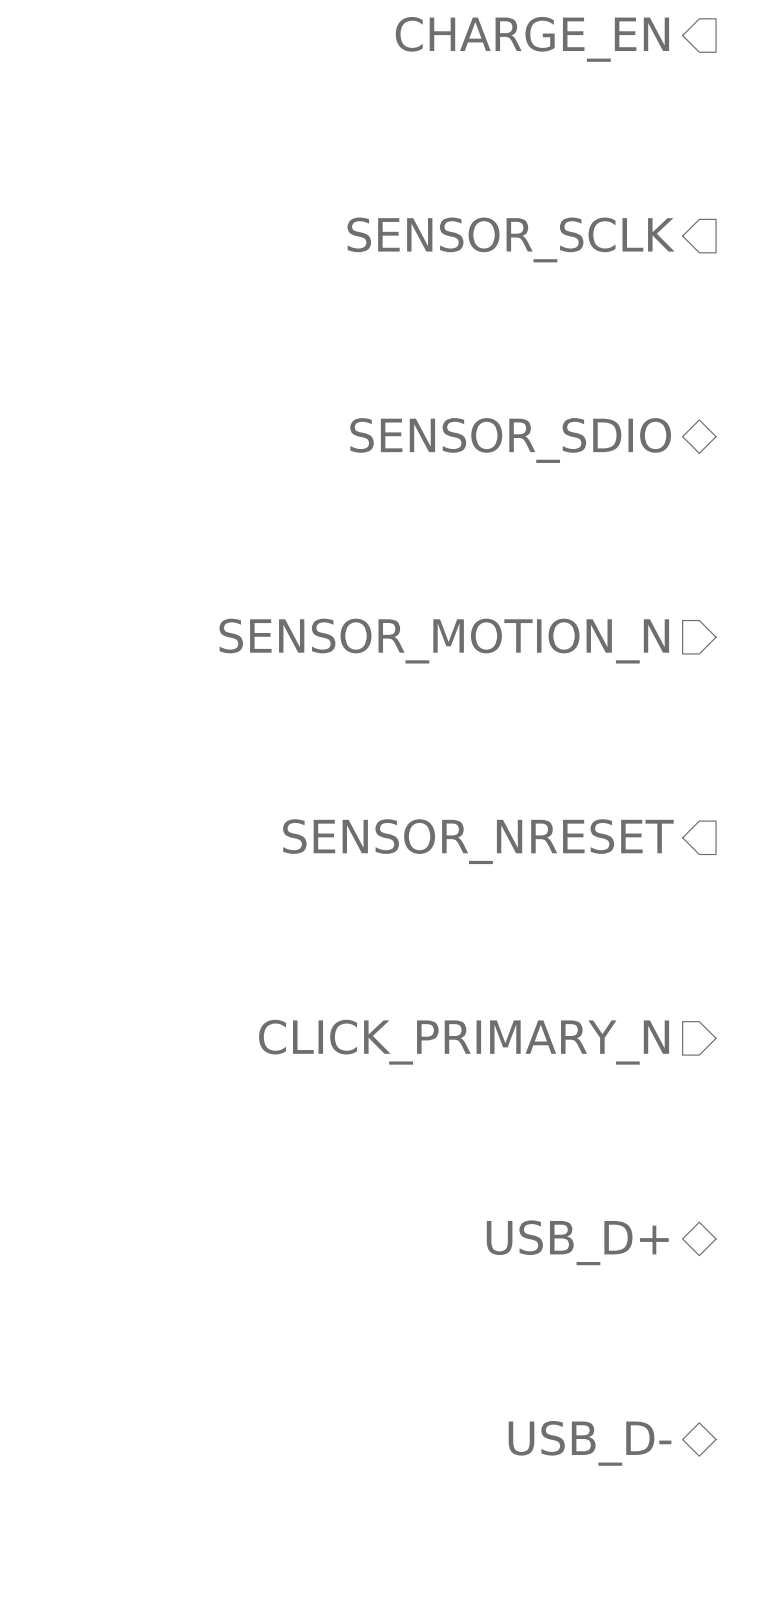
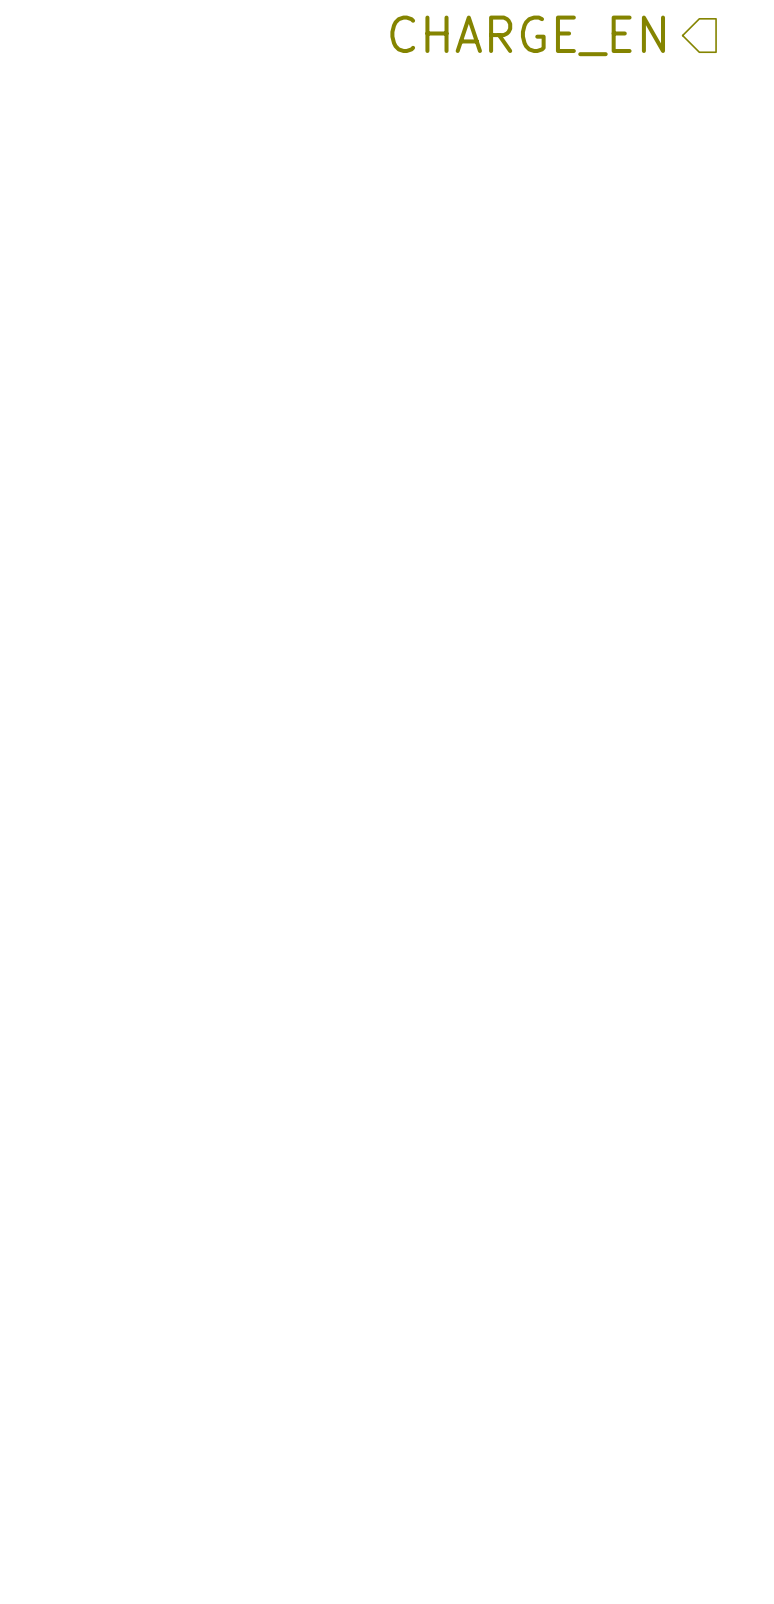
hierarchical label: SENSOR_SCLK (511, 239) -> none
hierarchical label: SENSOR_SDIO (510, 440) -> none
hierarchical label: SENSOR_MOTION_N (444, 641) -> none
hierarchical label: SENSOR_NRESET (478, 841) -> none
hierarchical label: CLICK_PRIMARY_N (464, 1042) -> none
hierarchical label: USB_D+ (577, 1242) -> none
hierarchical label: USB_D- (590, 1443) -> none

